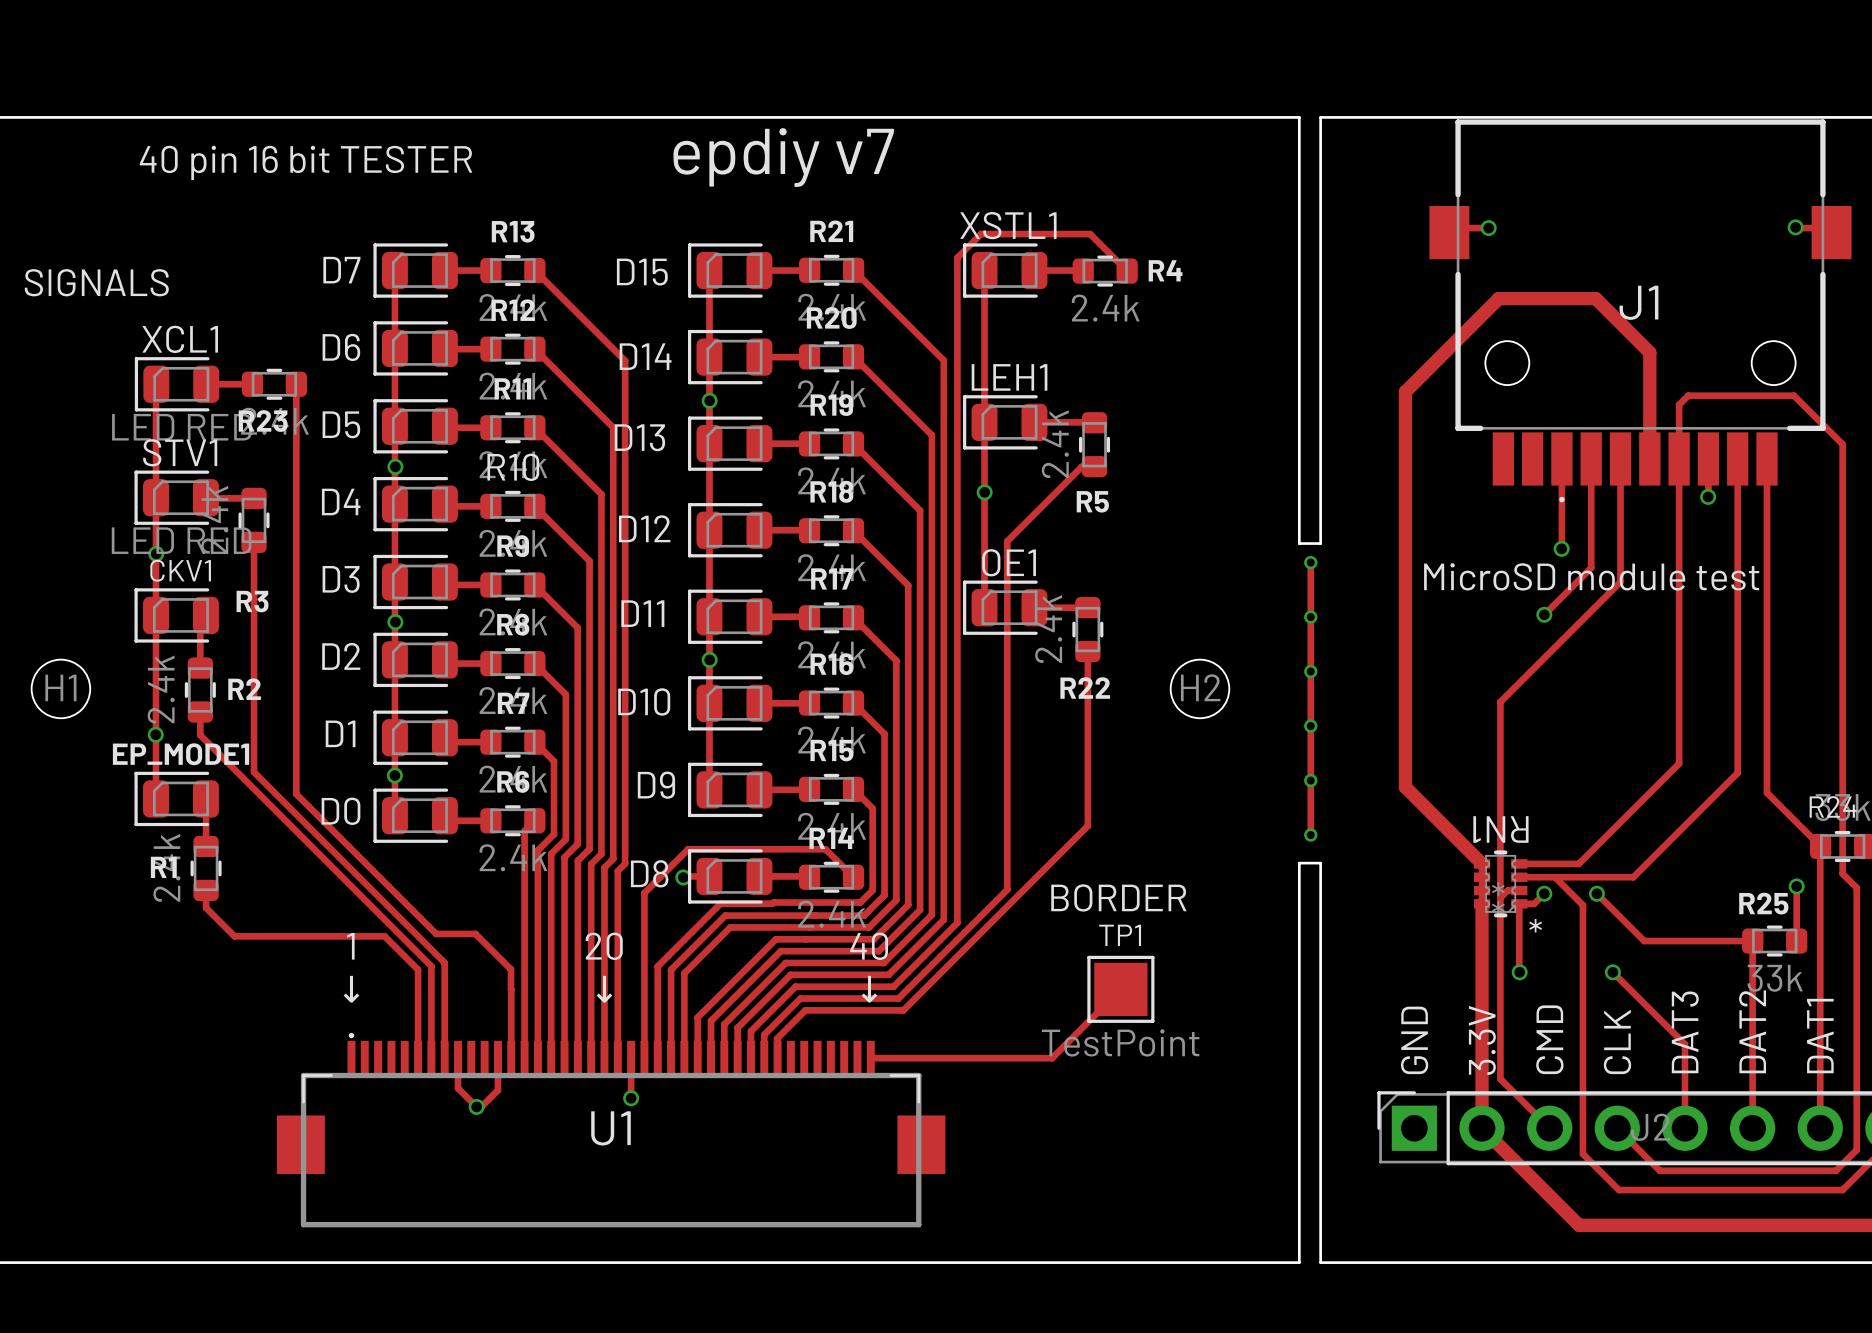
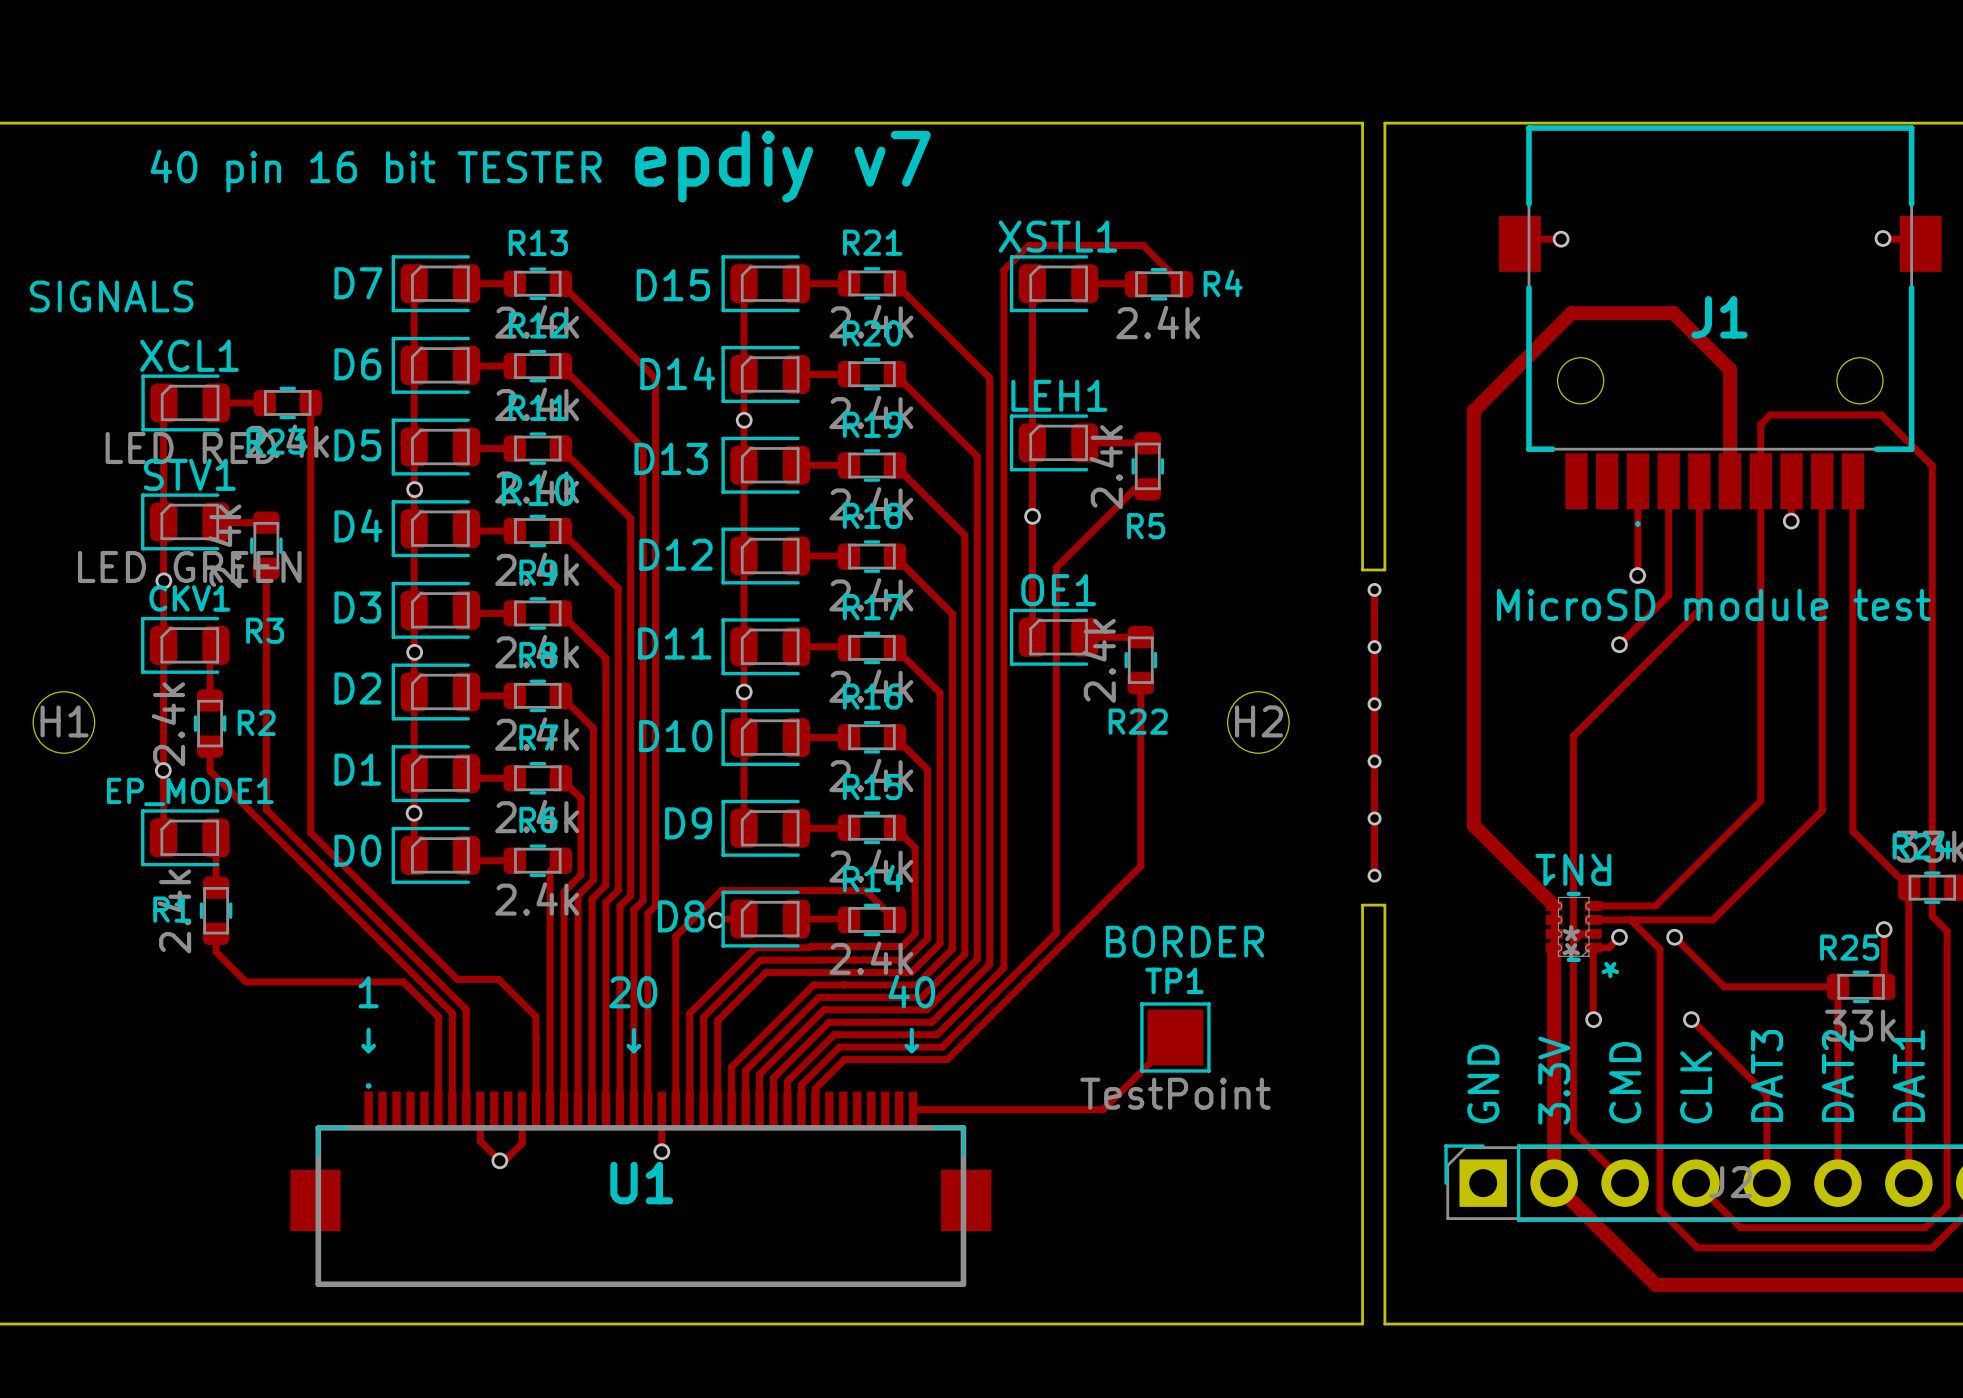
STV1 value: LED RED (181, 540) -> LED GREEN (189, 566)

